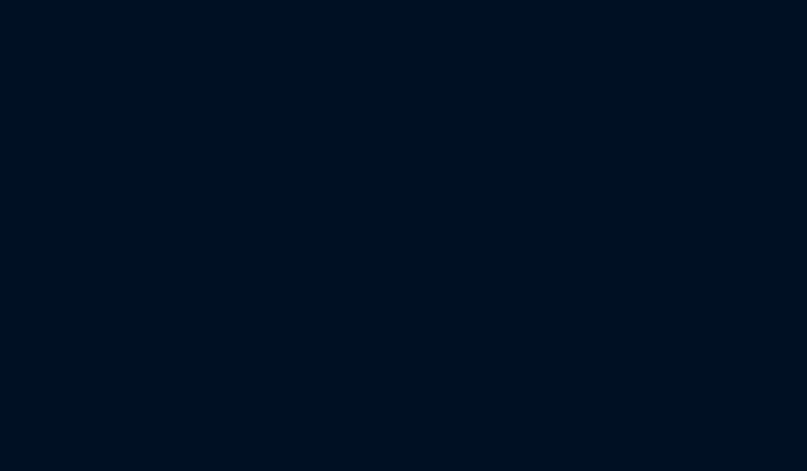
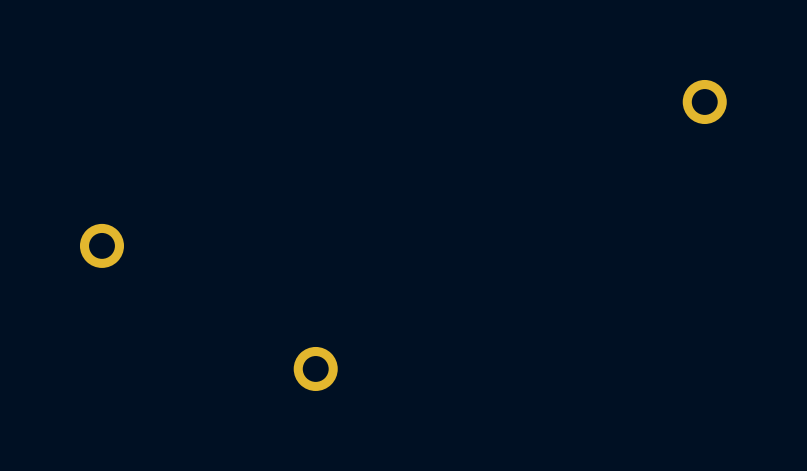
part: none -> (704, 101)
part: none -> (101, 245)
part: none -> (315, 368)

